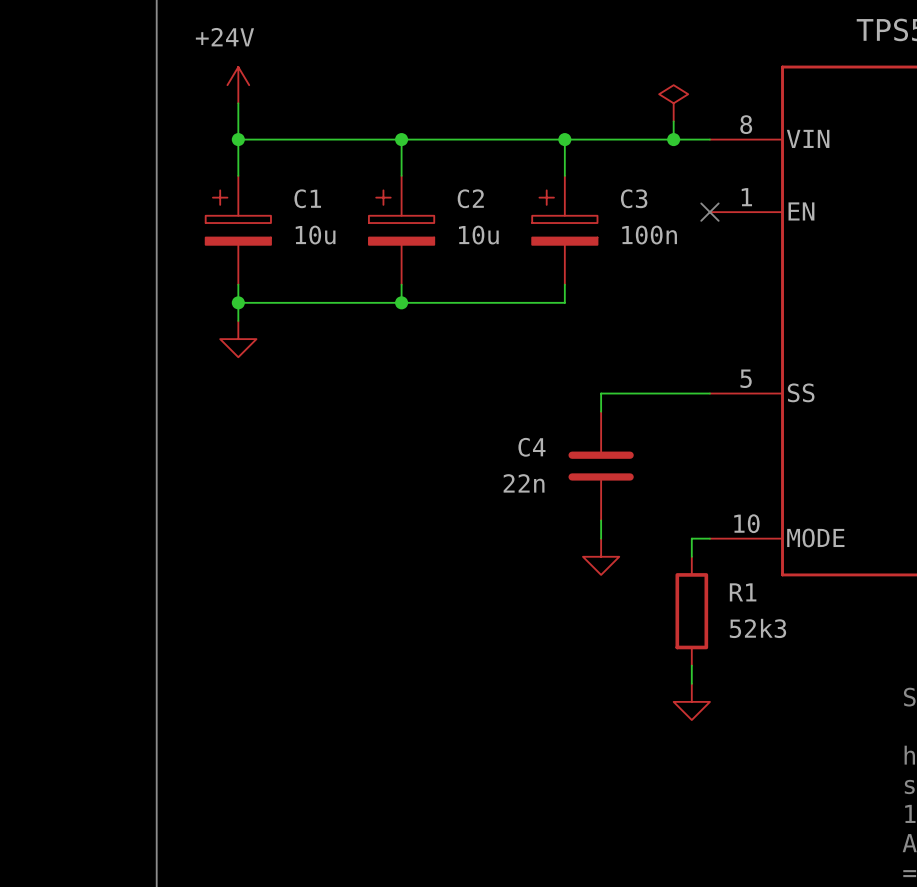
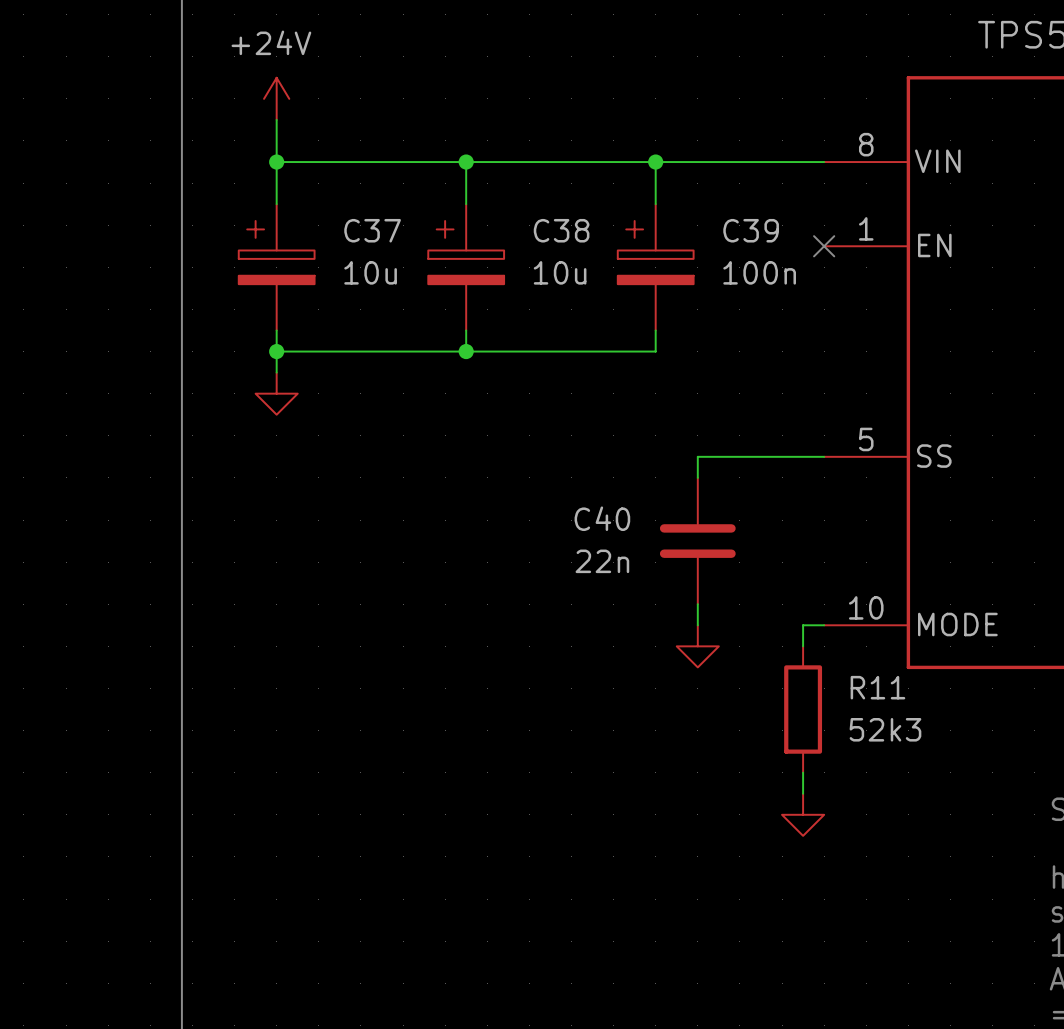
power symbol: (673, 103) -> none
wire: (673, 121) (673, 139) -> none
junction: (673, 139) -> none
C1 name: C1 (307, 198) -> C37 (372, 230)
C2 name: C2 (470, 198) -> C38 (561, 230)
C3 name: C3 (634, 198) -> C39 (751, 230)
C4 name: C4 (531, 447) -> C40 (602, 518)
R1 name: R1 (743, 592) -> R11 (877, 687)

